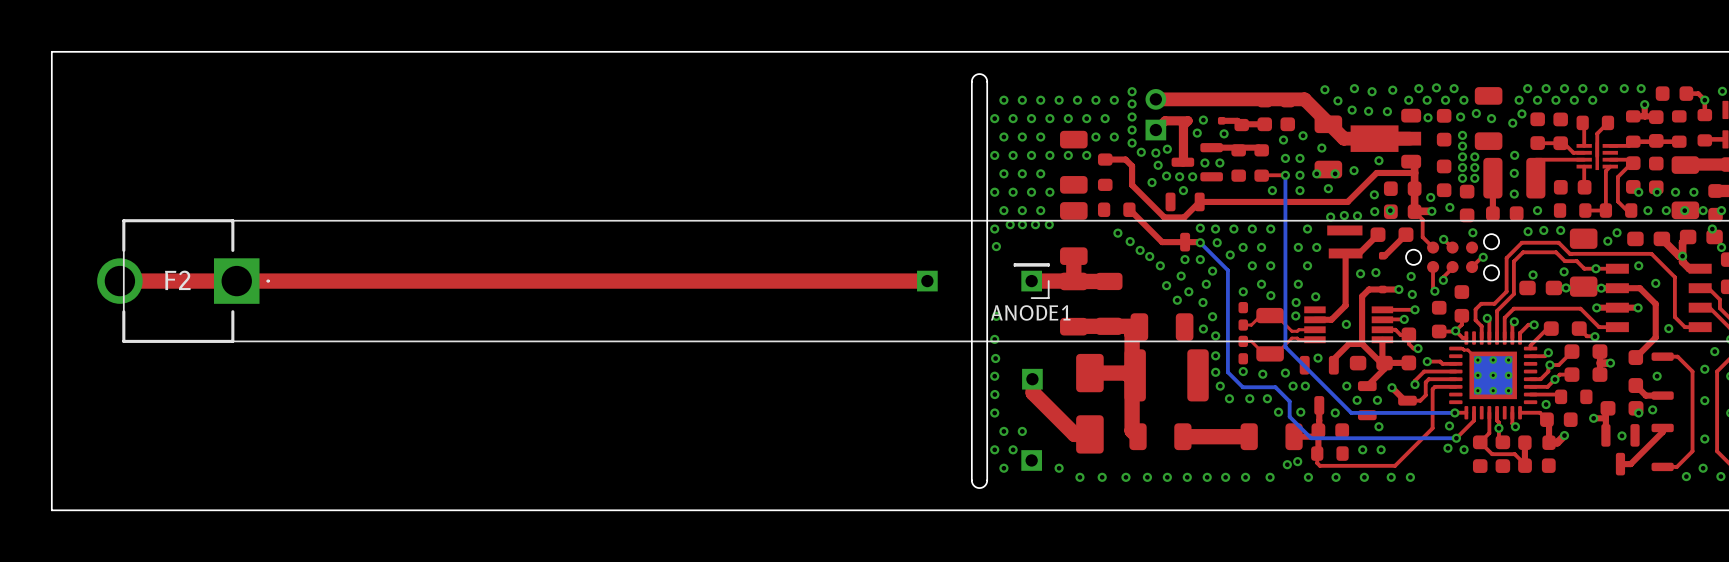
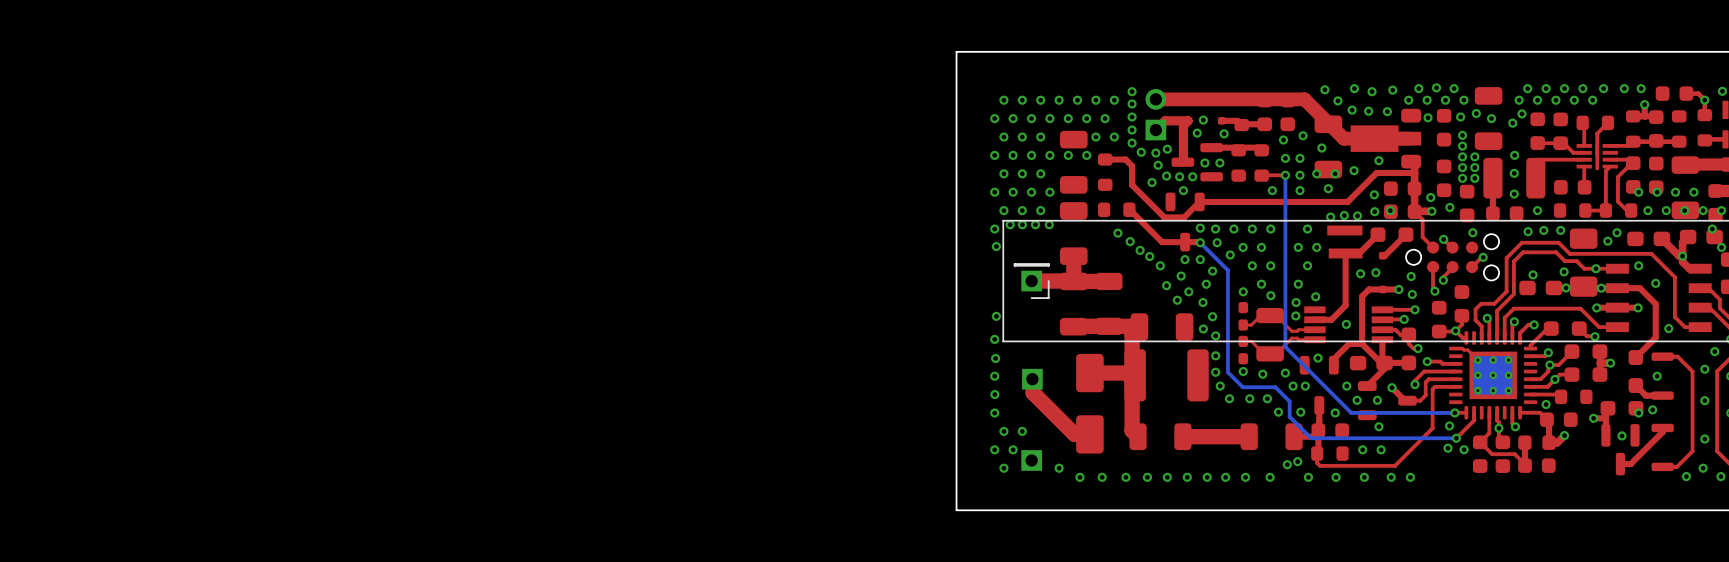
board edge: (956, 51) (51, 51) (51, 510) (956, 510) -> (956, 51) (956, 510)
board edge: (987, 81) (987, 480) (985, 485) (979, 488) (974, 486) (971, 480) (971, 81) (973, 76) (979, 74) (984, 75) (987, 81) -> none
line: (1003, 220) (123, 220) (123, 341) (1003, 341) -> (1003, 220) (1003, 341)
F2: (183, 281) -> none
top track: (927, 281) (119, 281) -> none
part: (927, 281) -> none
ANODE1 name: ANODE1 (1030, 312) -> none

